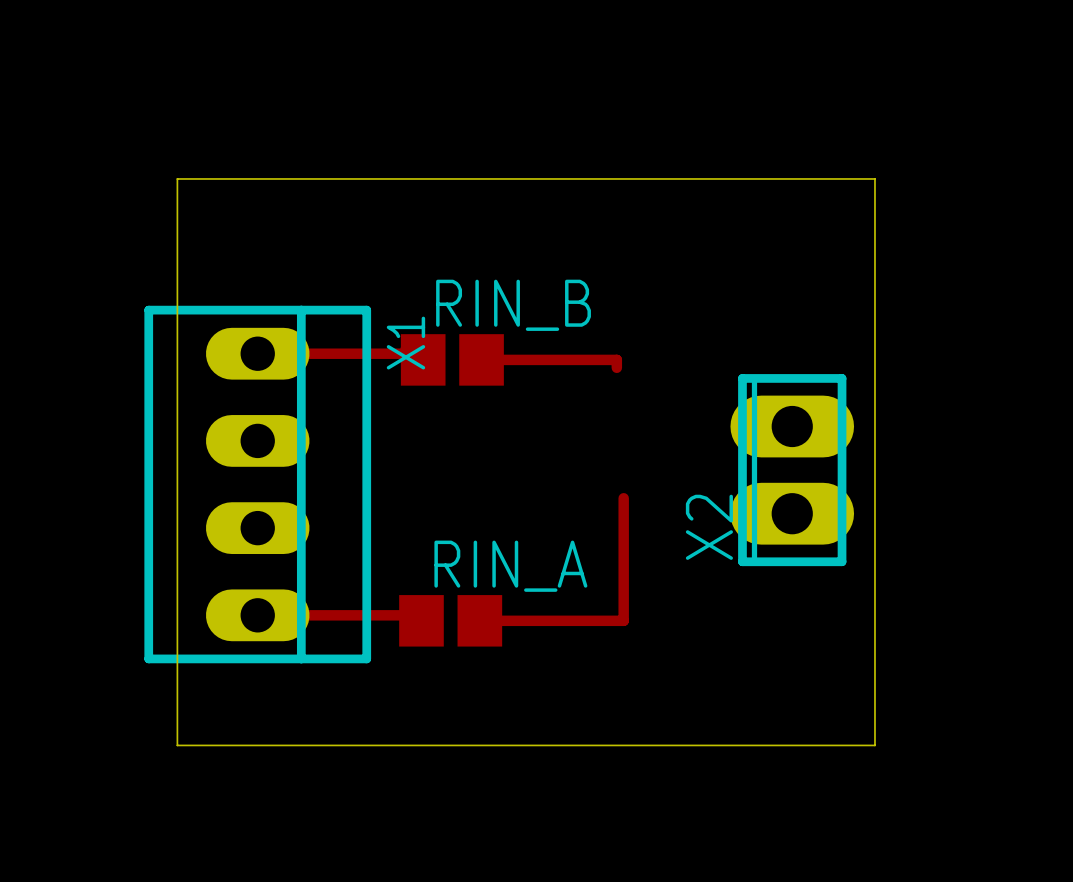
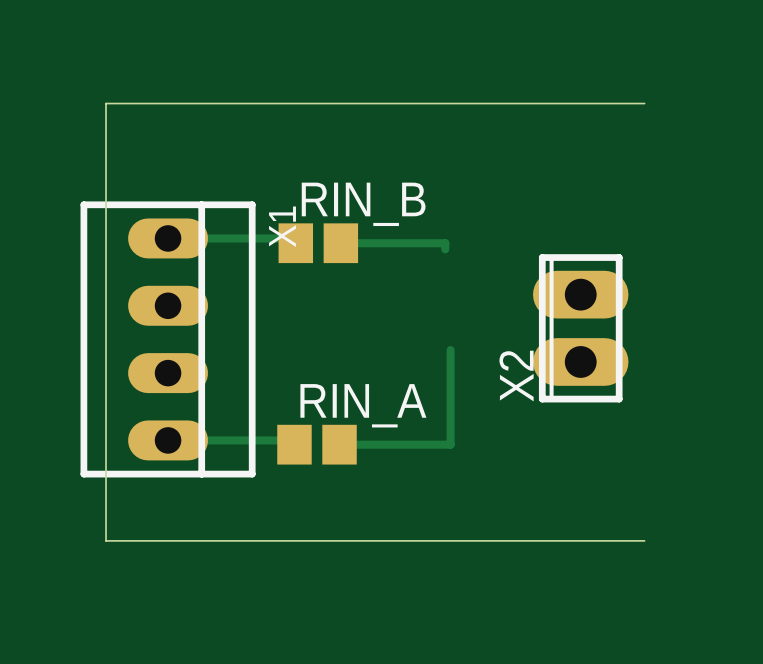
board edge: (874, 178) (874, 745) -> none

